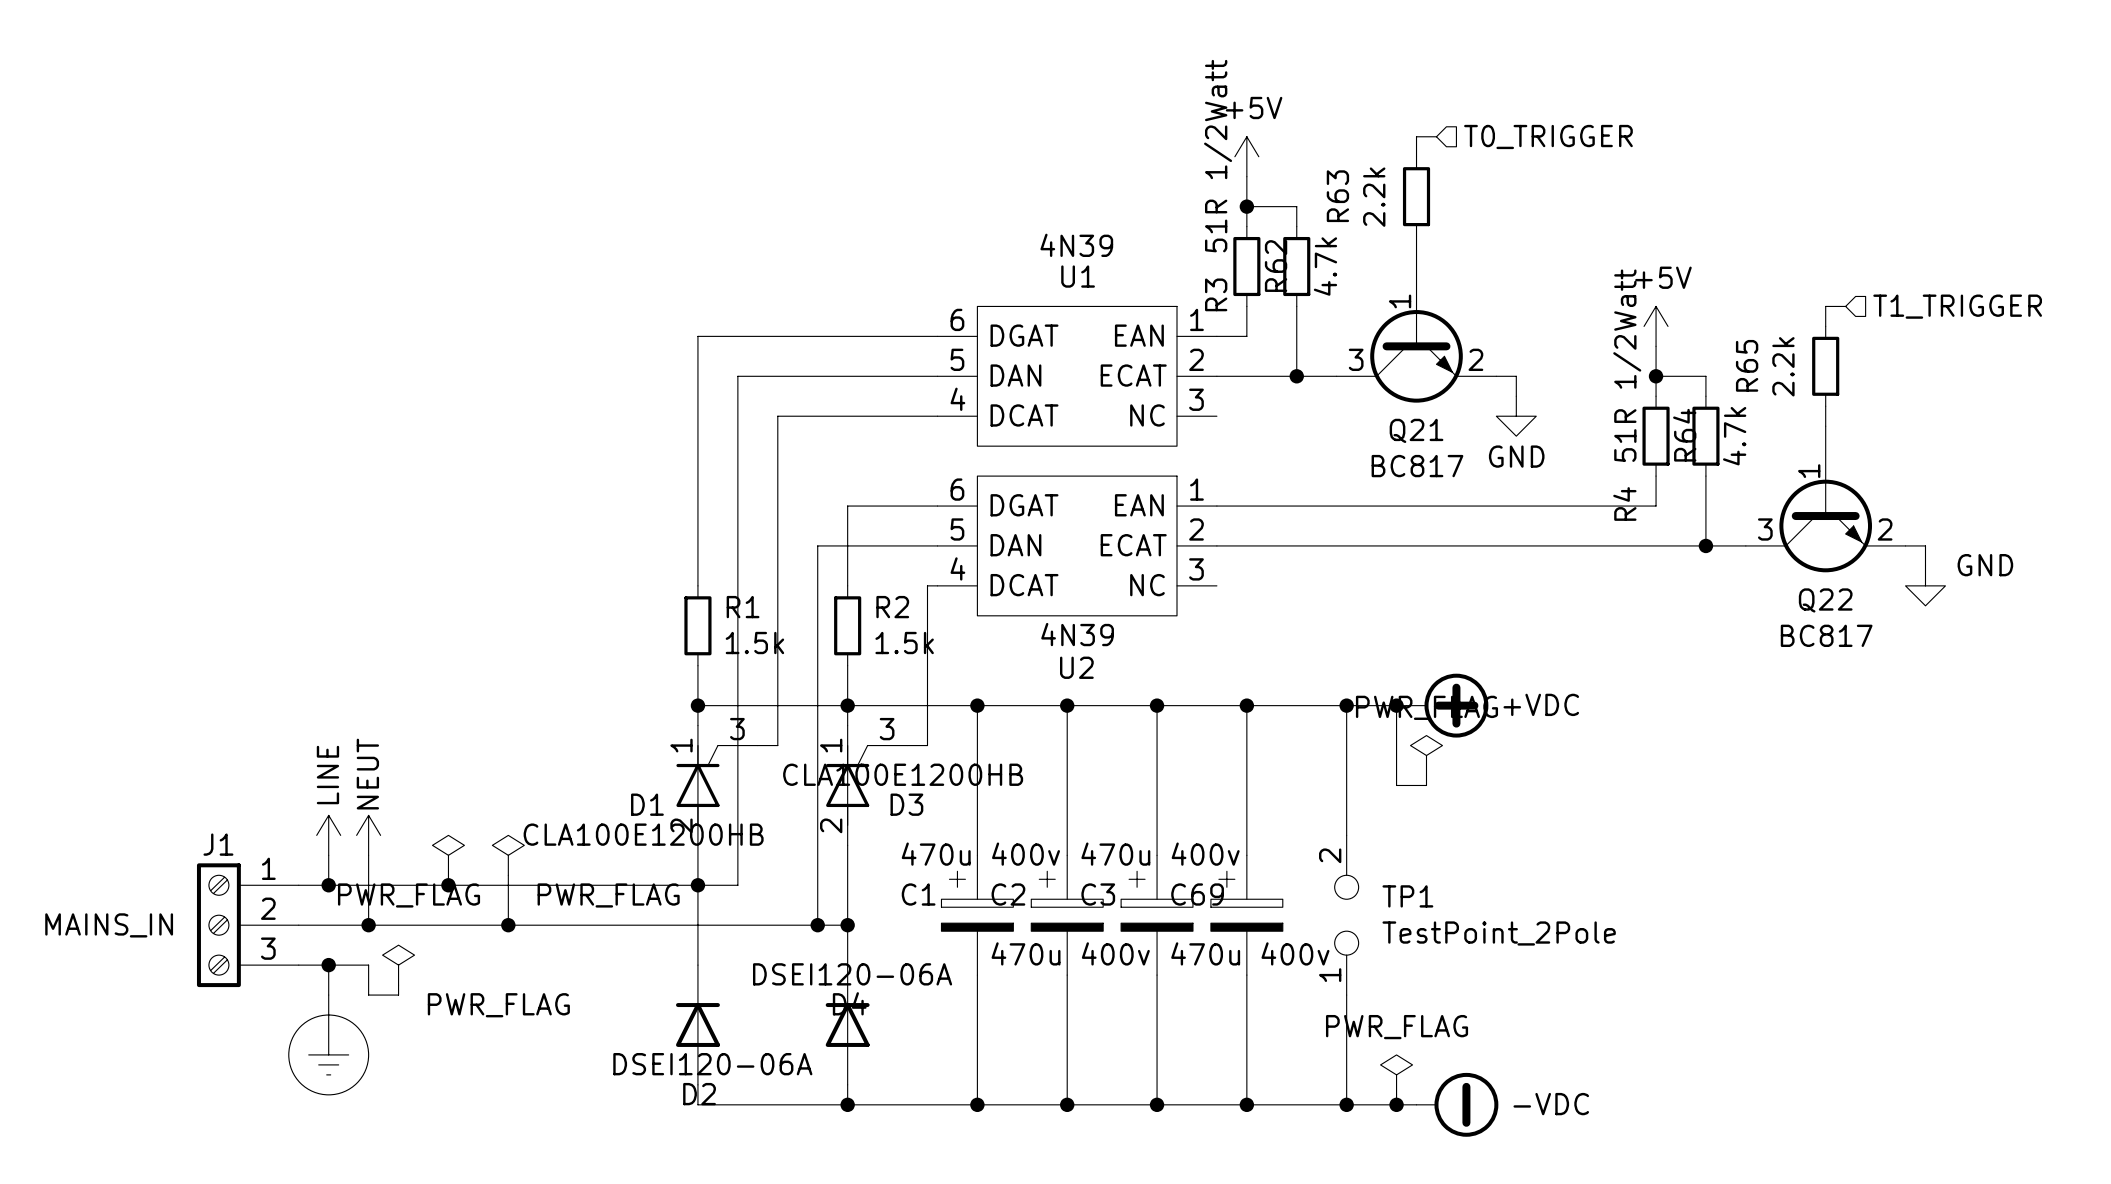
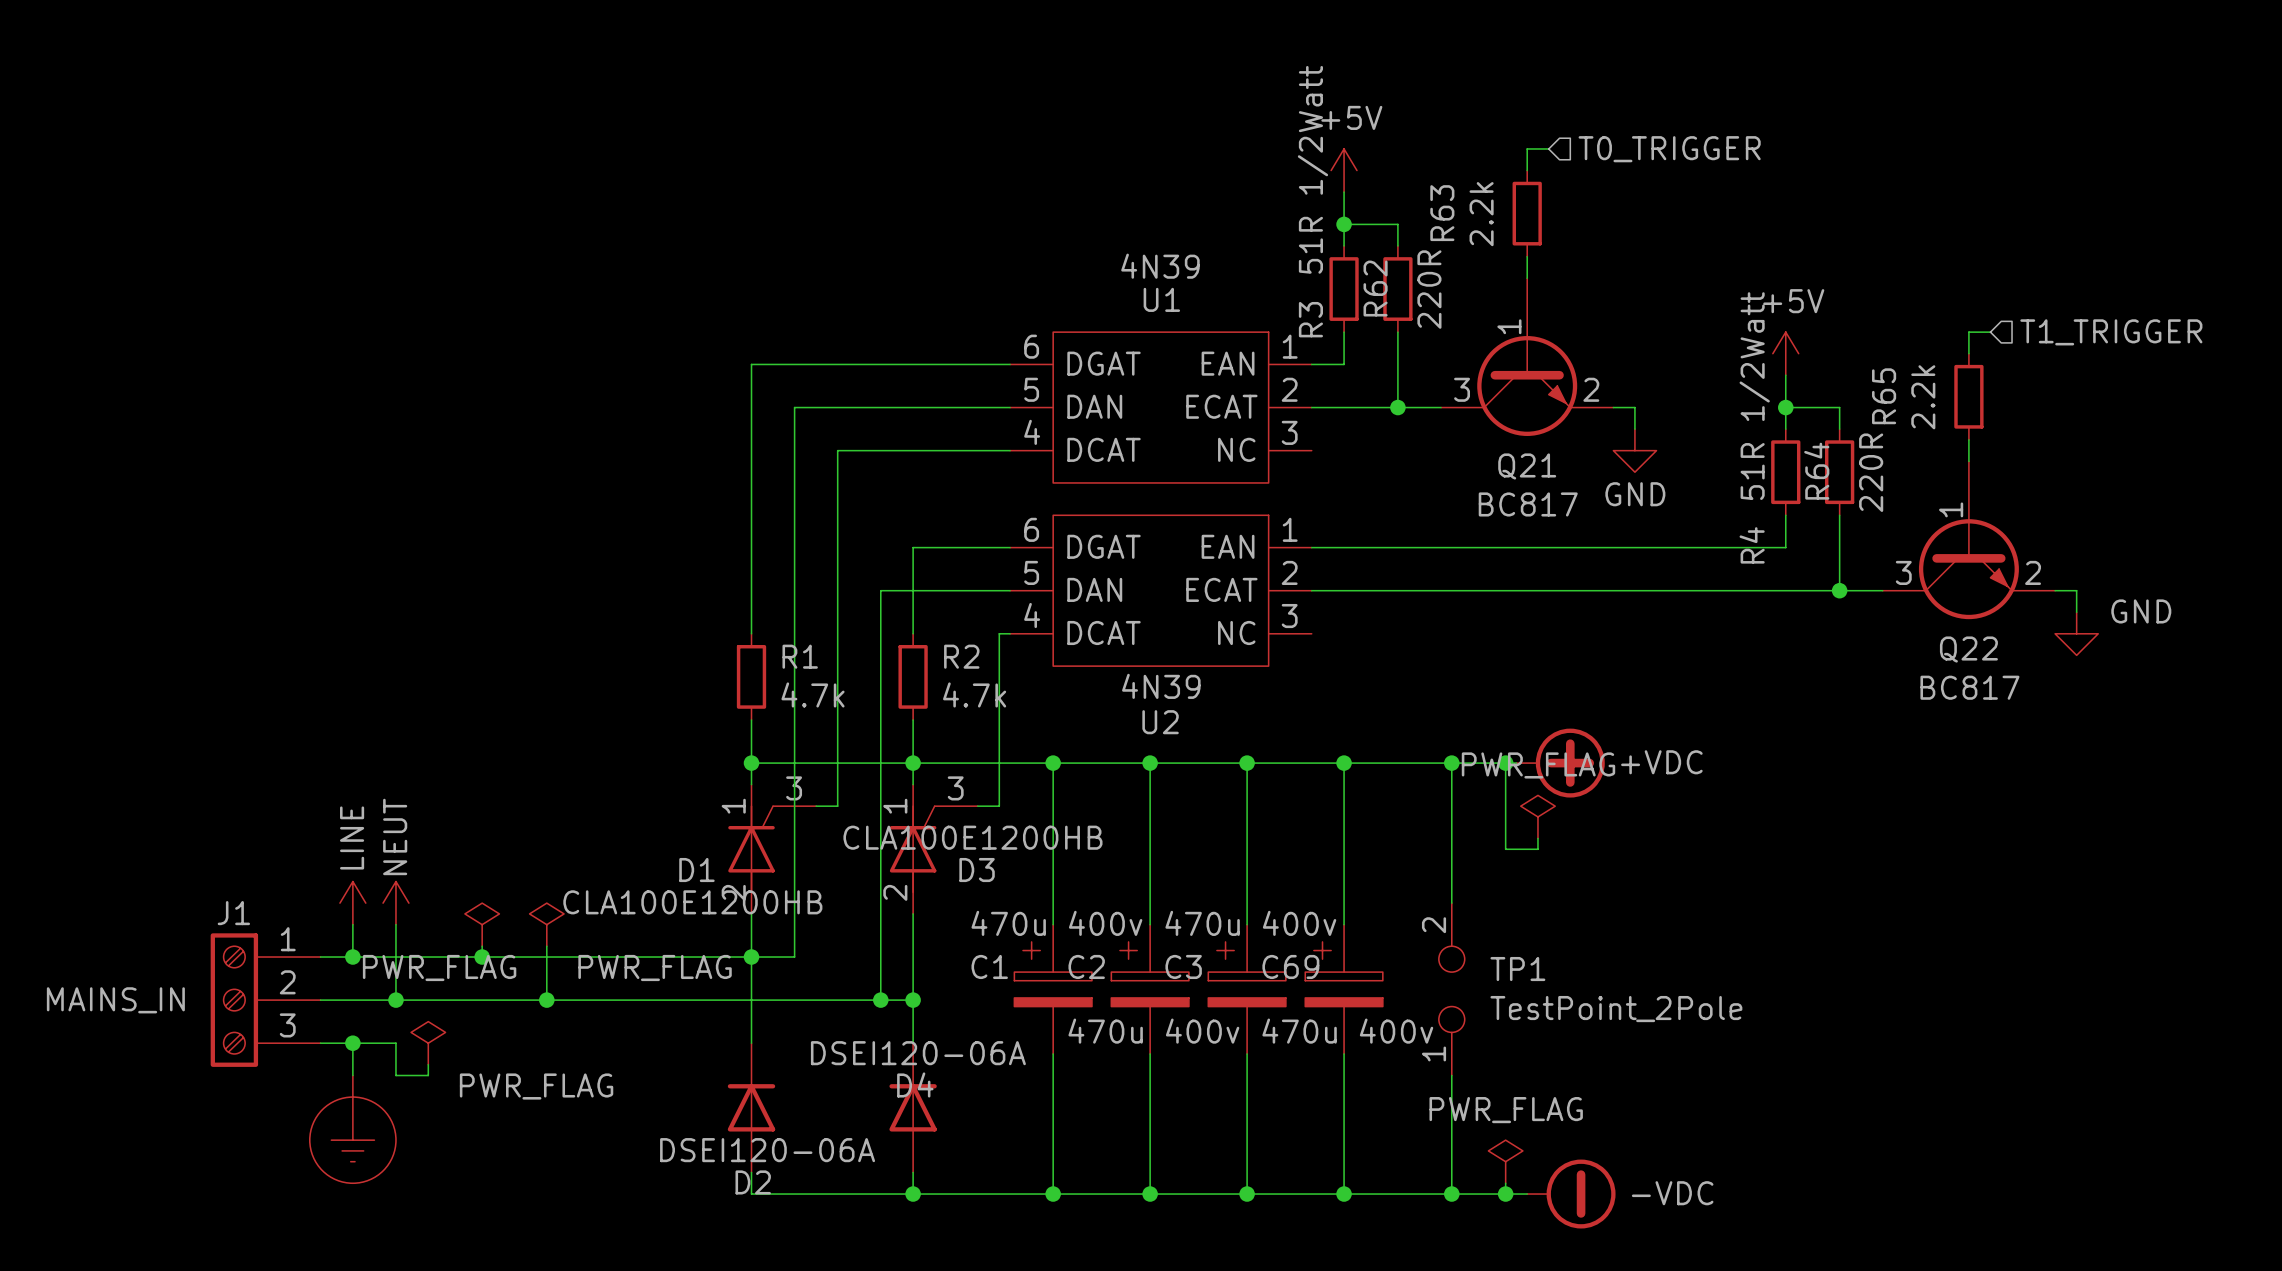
R62 value: 4.7k (1325, 266) -> 220R (1429, 289)
R64 value: 4.7k (1734, 436) -> 220R (1871, 472)
R1 value: 1.5k (754, 643) -> 4.7k (813, 694)
R2 value: 1.5k (904, 643) -> 4.7k (974, 694)

